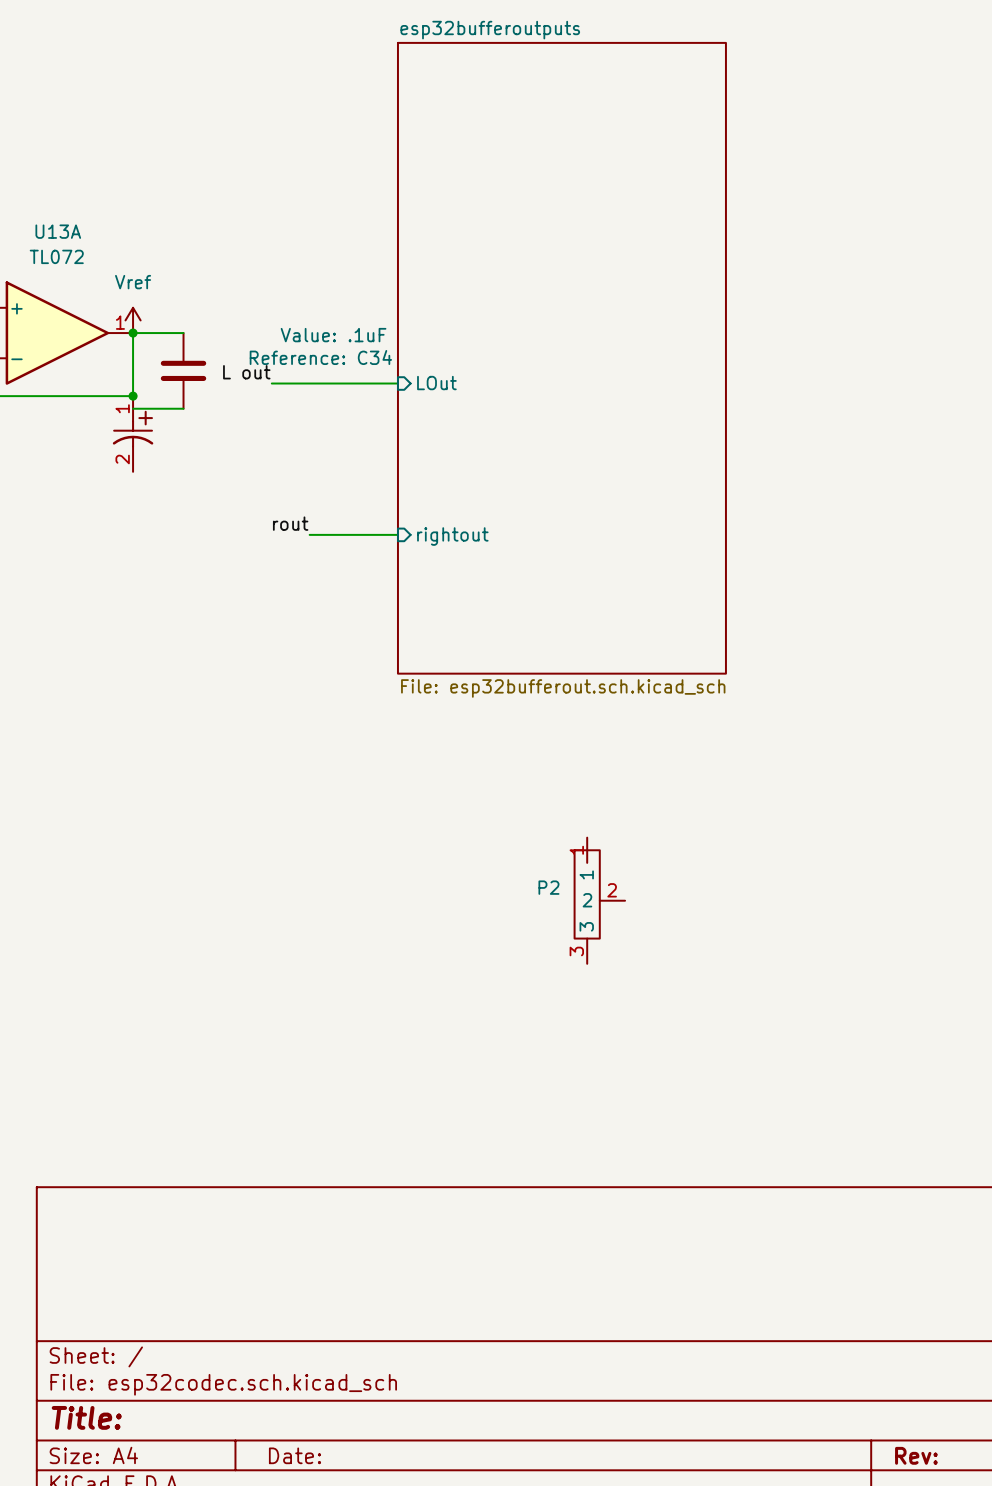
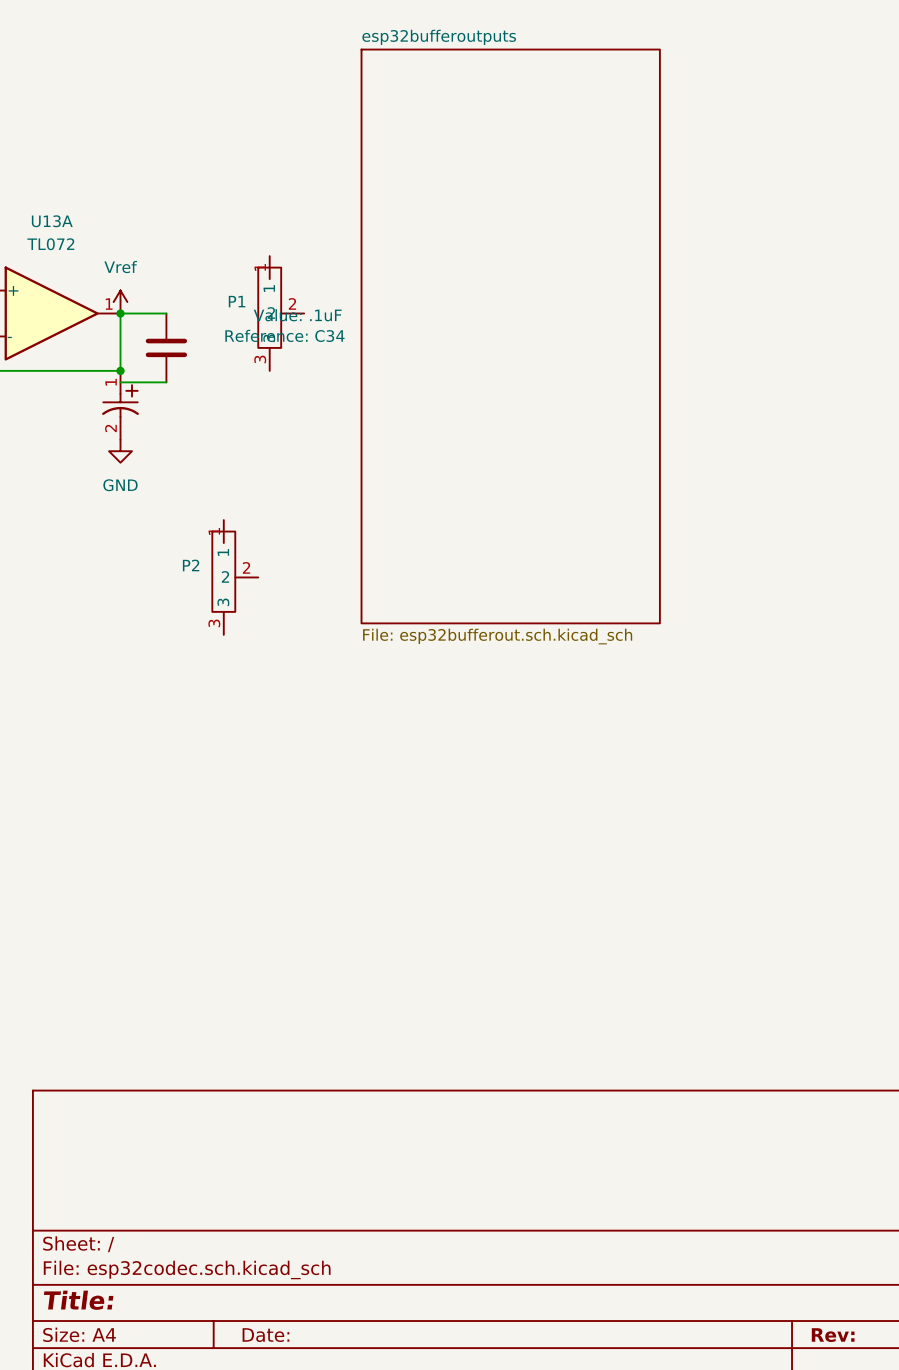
P1: none -> (281, 313)
label: L out (246, 372) -> none
wire: (271, 383) (397, 383) -> none
sheet pin: LOut (436, 383) -> none
power symbol: none -> GND (120, 451)
label: rout (290, 523) -> none
wire: (309, 534) (397, 534) -> none
sheet pin: rightout (452, 536) -> none
P2 position: (599, 900) -> (235, 577)

